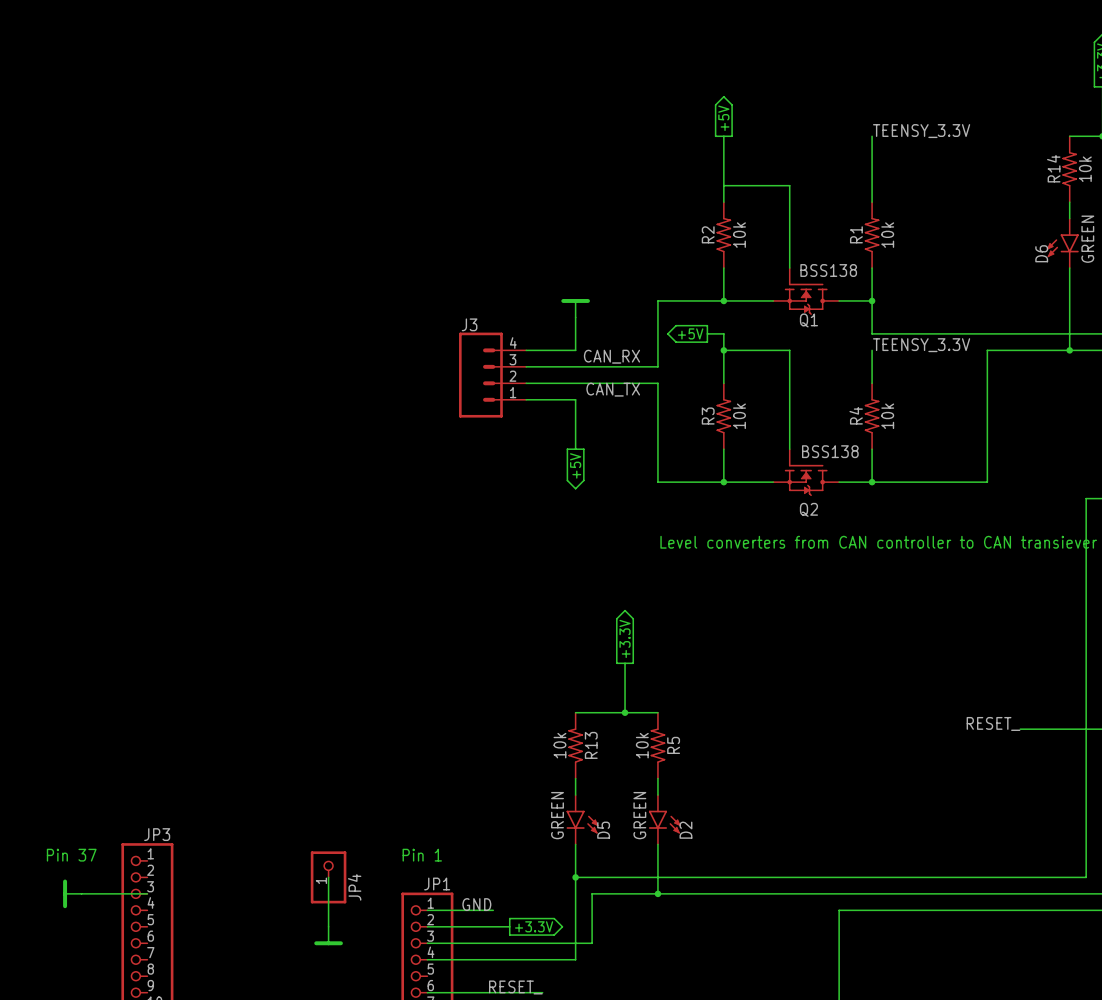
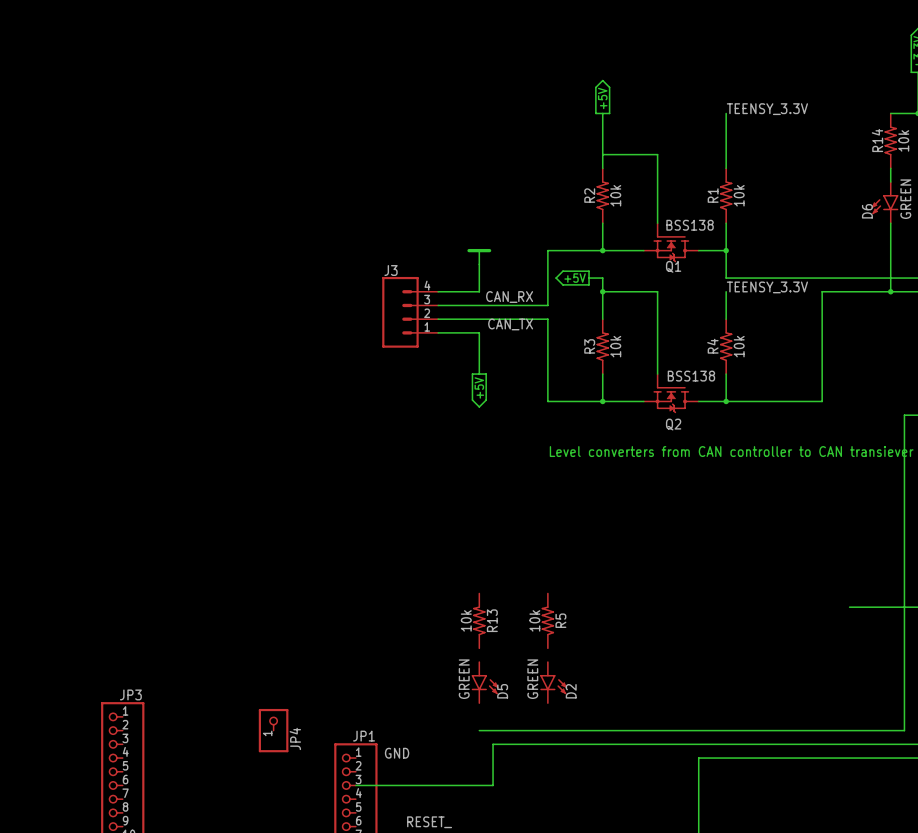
power symbol: (625, 636) -> none
wire: (625, 663) (625, 712) -> none
wire: (575, 712) (657, 712) -> none
junction: (625, 712) -> none
label: RESET_ (993, 723) -> none
wire: (575, 778) (575, 795) -> none
wire: (657, 778) (657, 795) -> none
wire: (575, 844) (575, 959) (427, 959) -> none
wire: (657, 844) (657, 893) -> none
text: Pin 37 (71, 855) -> none
text: Pin 1 (422, 855) -> none
wire: (328, 877) (328, 926) -> none
junction: (575, 877) -> none
power symbol: (72, 893) -> none
wire: (81, 893) (147, 893) -> none
junction: (657, 893) -> none
wire: (427, 910) (493, 910) -> none
wire: (427, 926) (509, 926) -> none
power symbol: (536, 926) -> none
power symbol: (328, 935) -> none
wire: (427, 992) (542, 992) -> none

